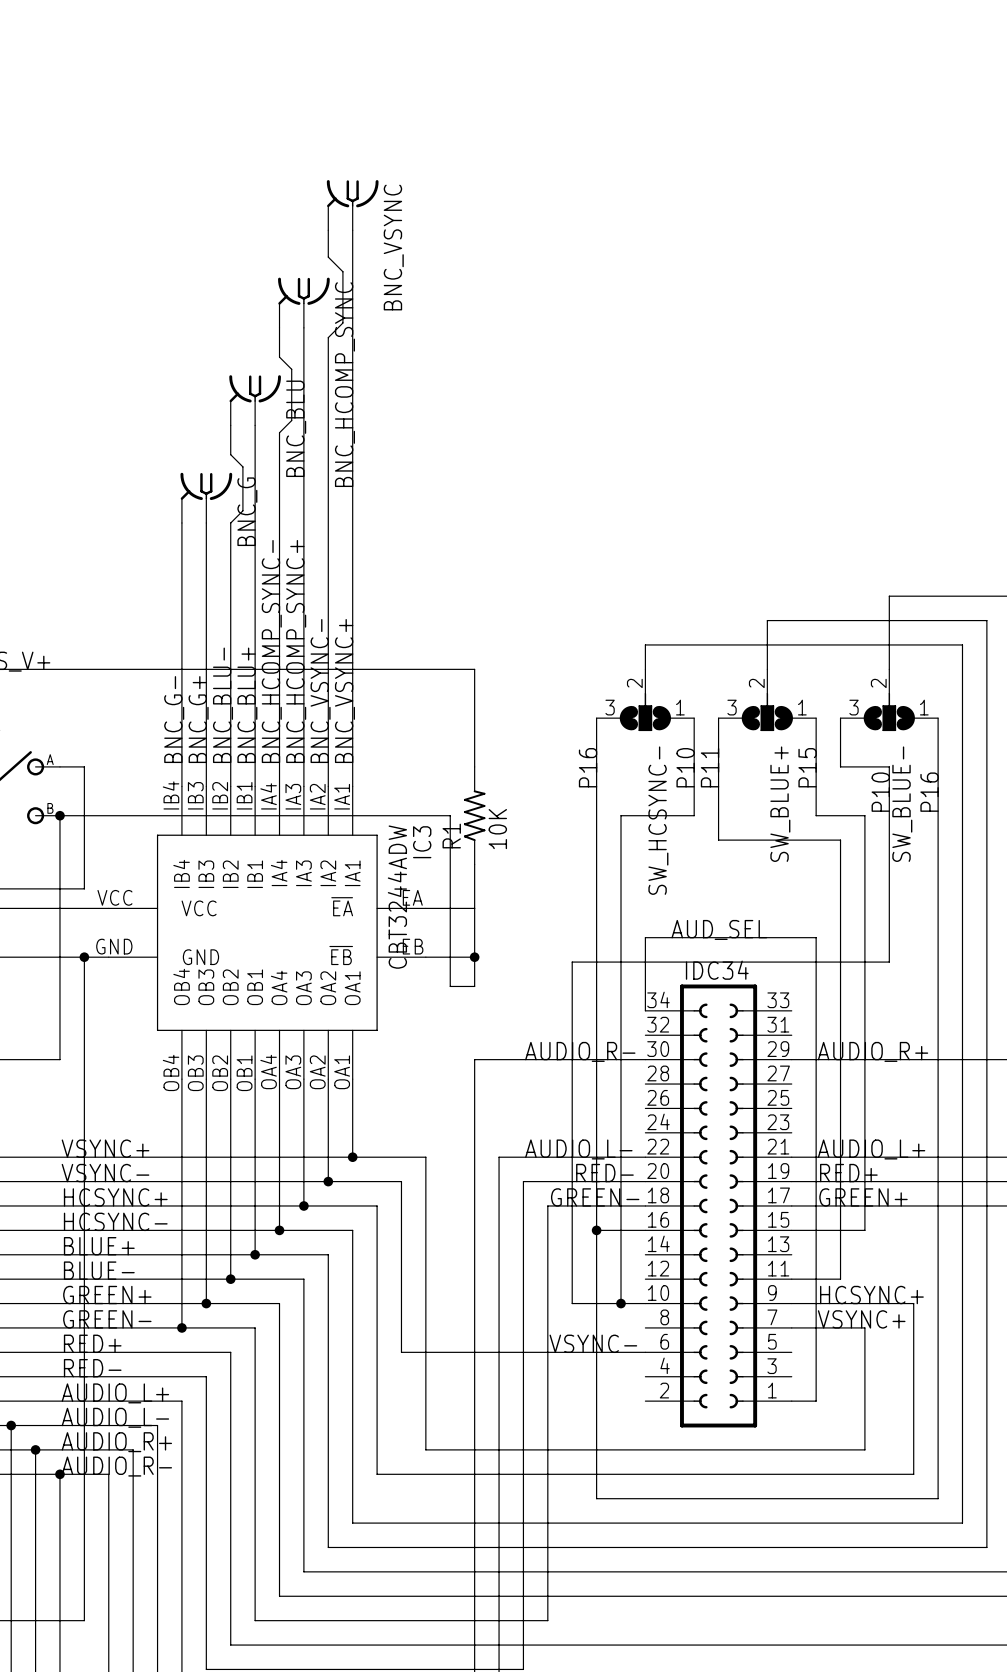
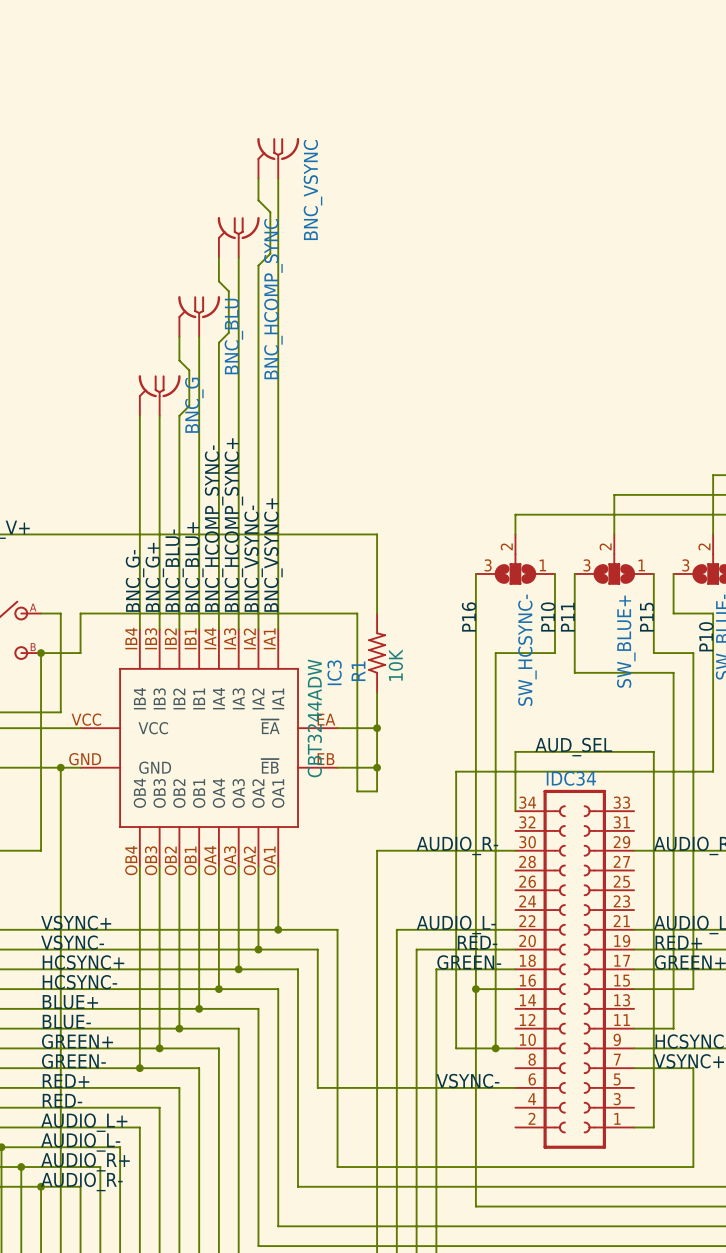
wire: (108, 815) (450, 815) -> (80, 653) (80, 613) (357, 613) (357, 653)
junction: none -> (377, 728)

